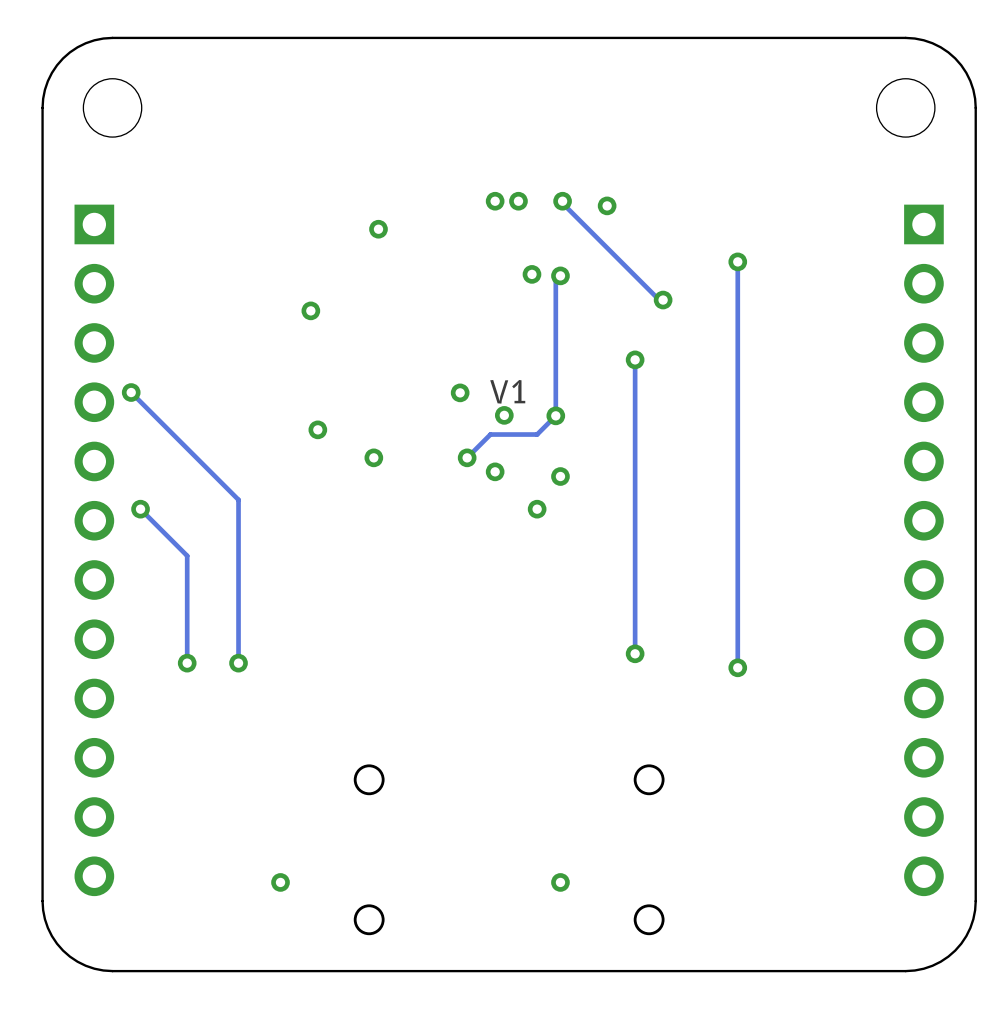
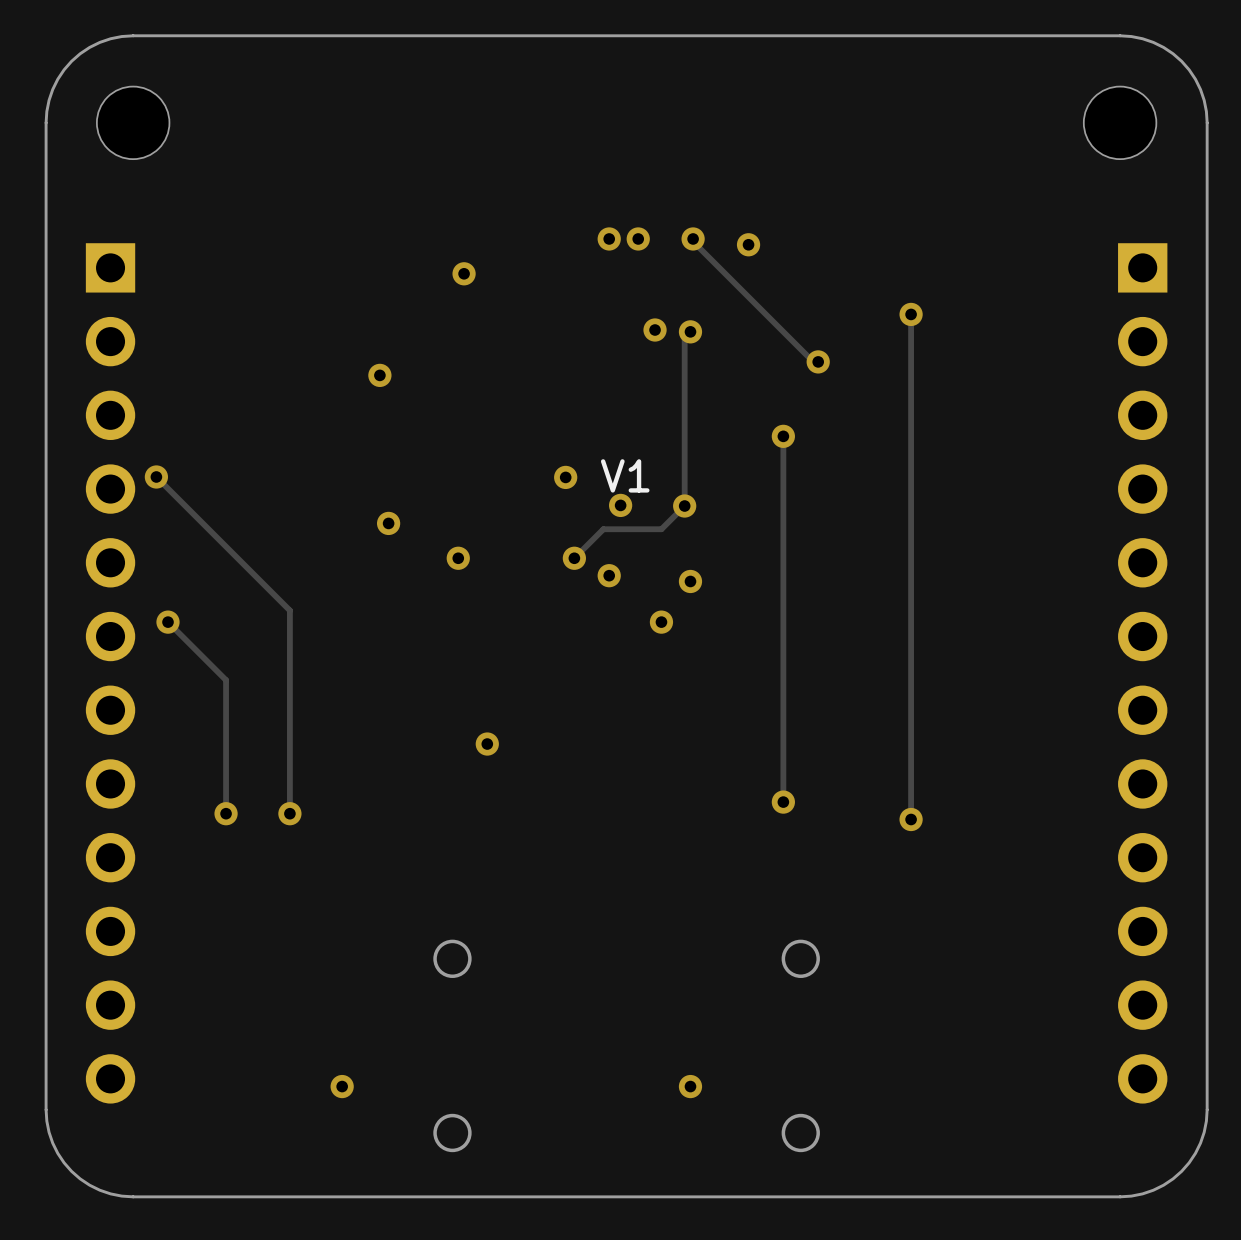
via: none -> (487, 744)

